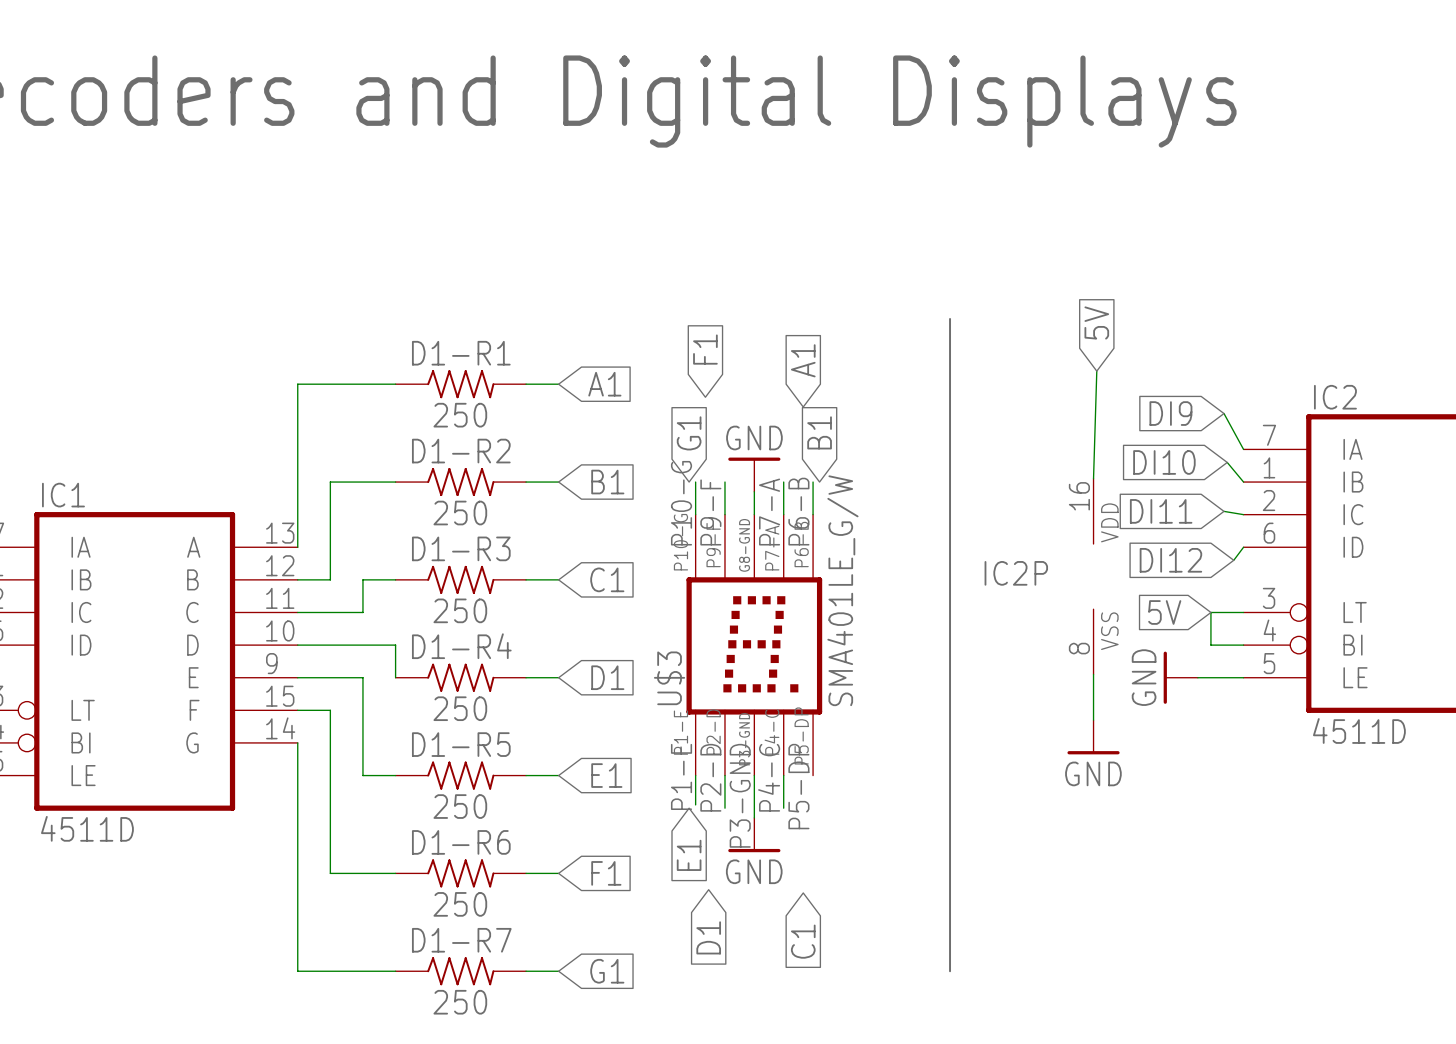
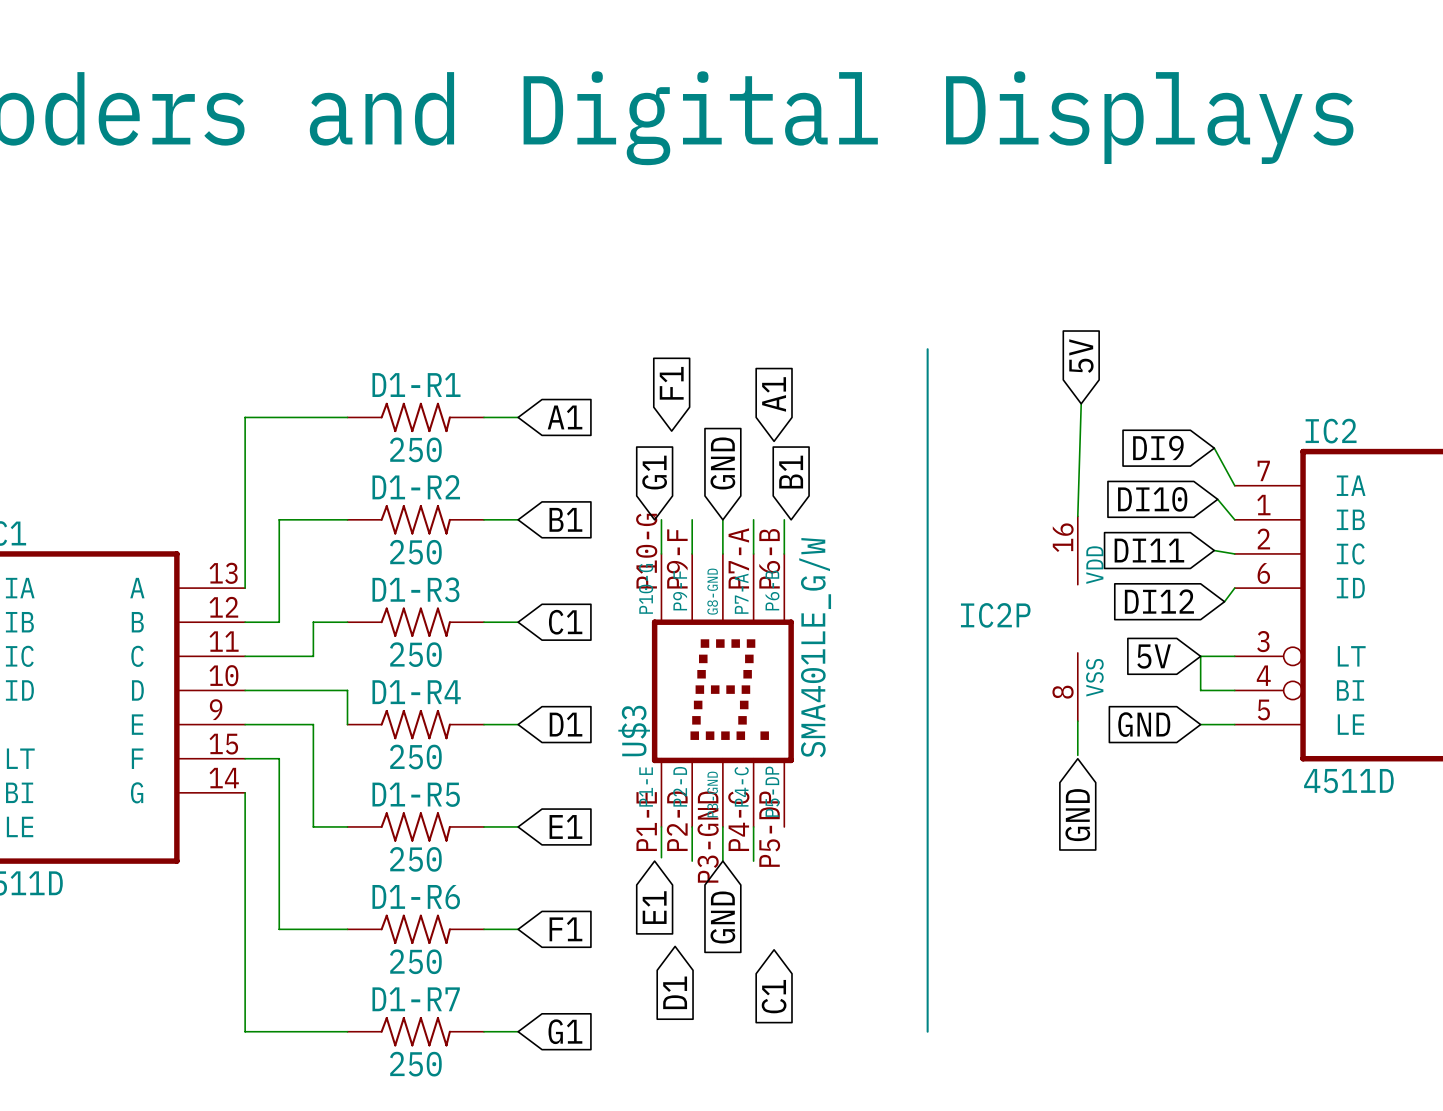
global label: none -> GND (722, 463)
power symbol: GND (754, 474) -> none
global label: none -> GND (1144, 724)
power symbol: GND (1180, 677) -> none
wire: (1197, 677) (1210, 677) -> none
wire: (1093, 707) (1093, 720) -> none
power symbol: GND (1093, 737) -> none
global label: none -> GND (1077, 815)
wire: (754, 808) (754, 817) -> none
power symbol: GND (754, 835) -> none
global label: none -> GND (722, 917)

